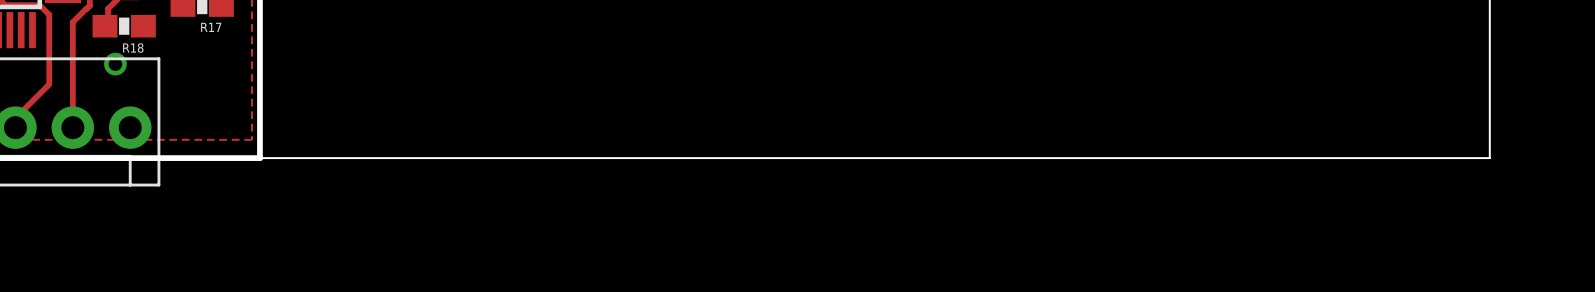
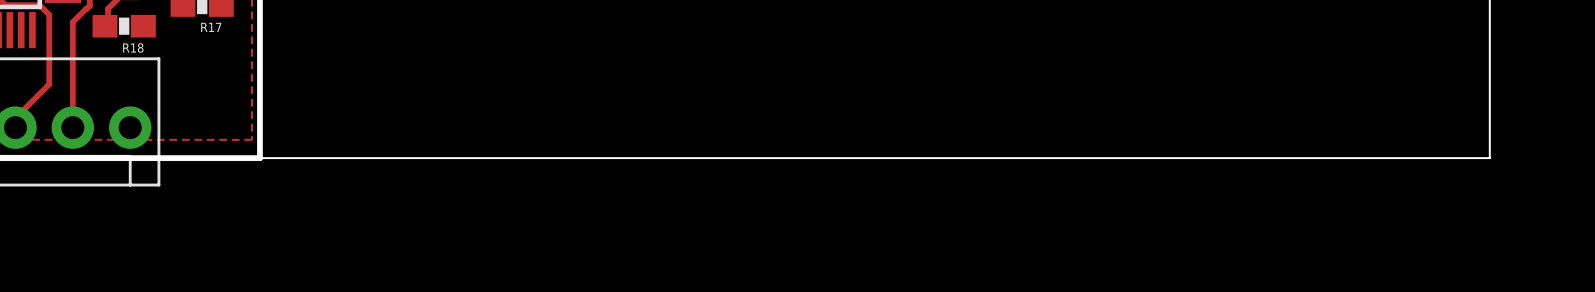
via: (115, 64) -> none

